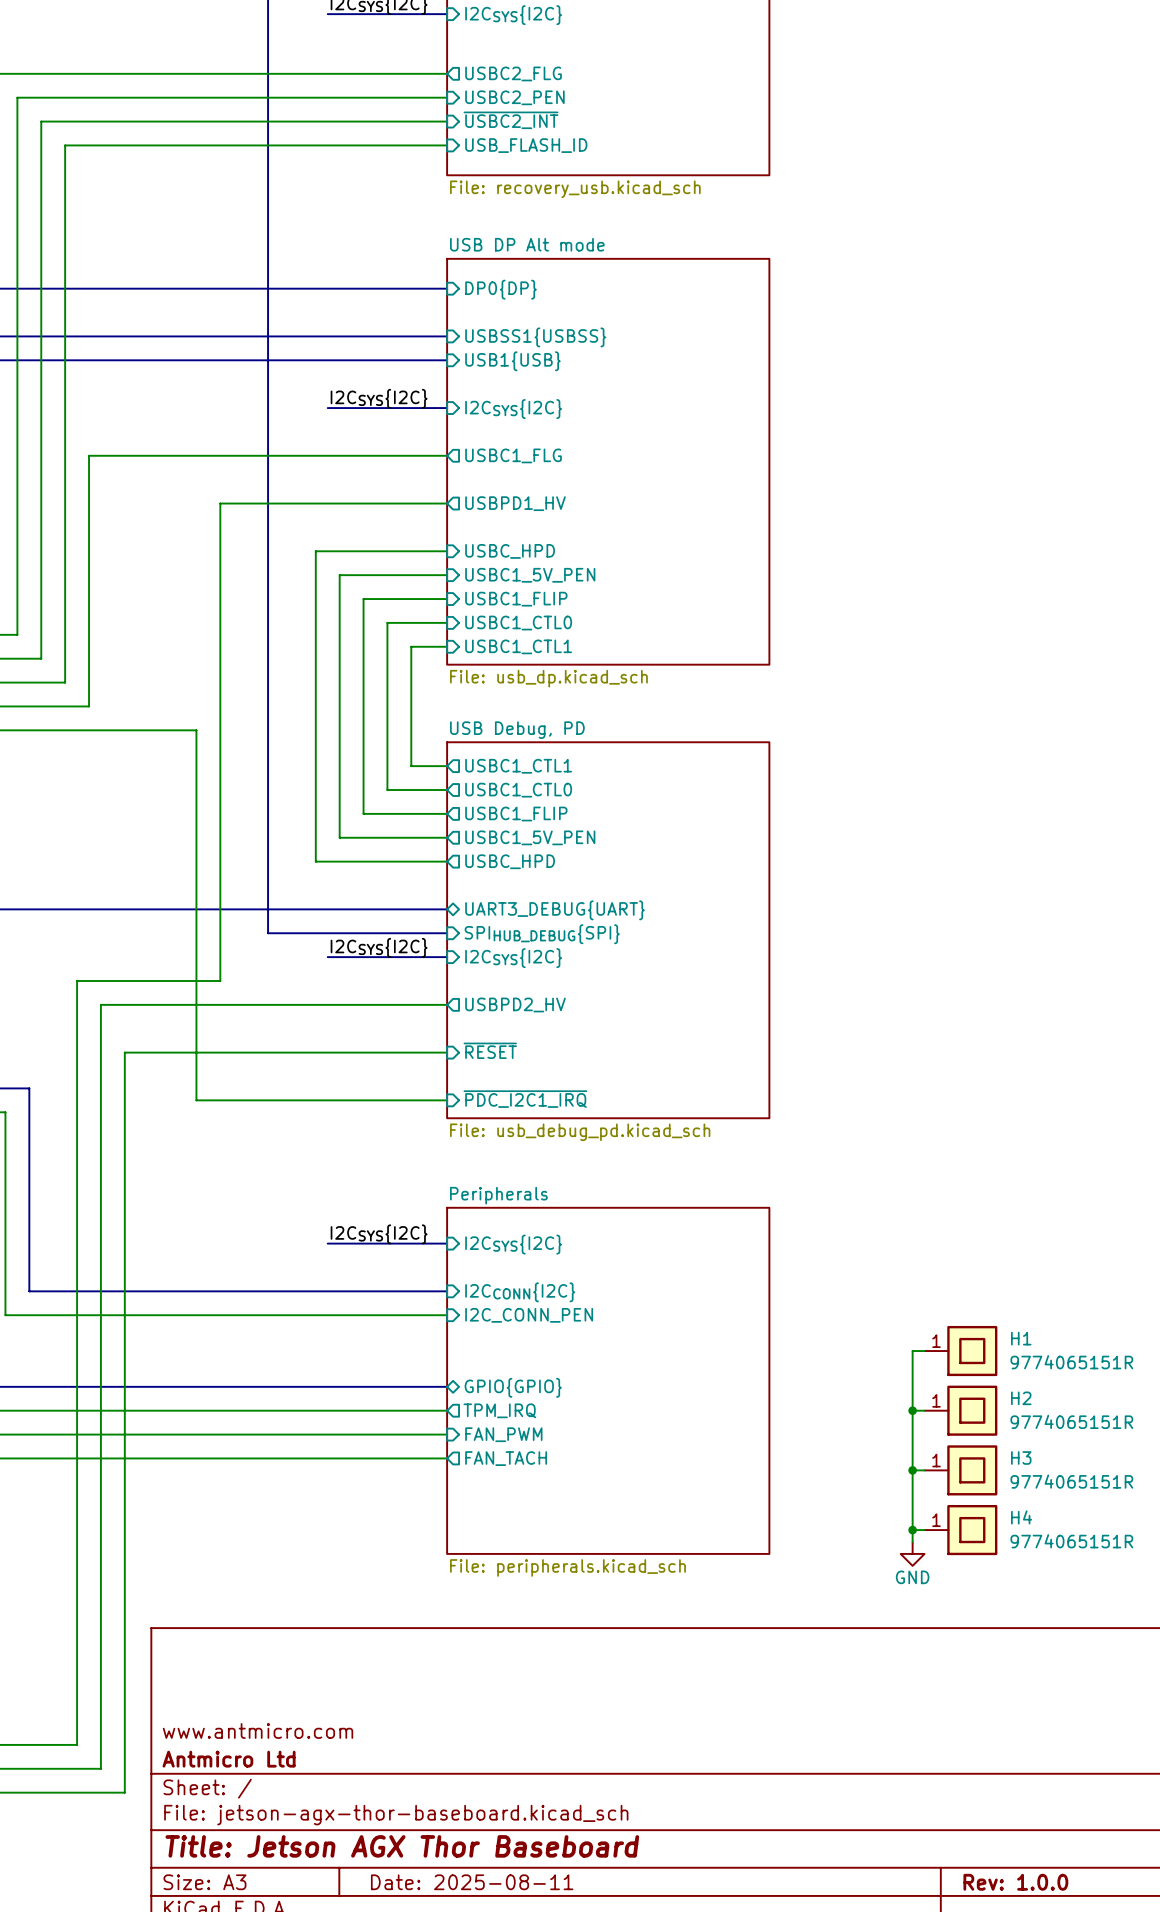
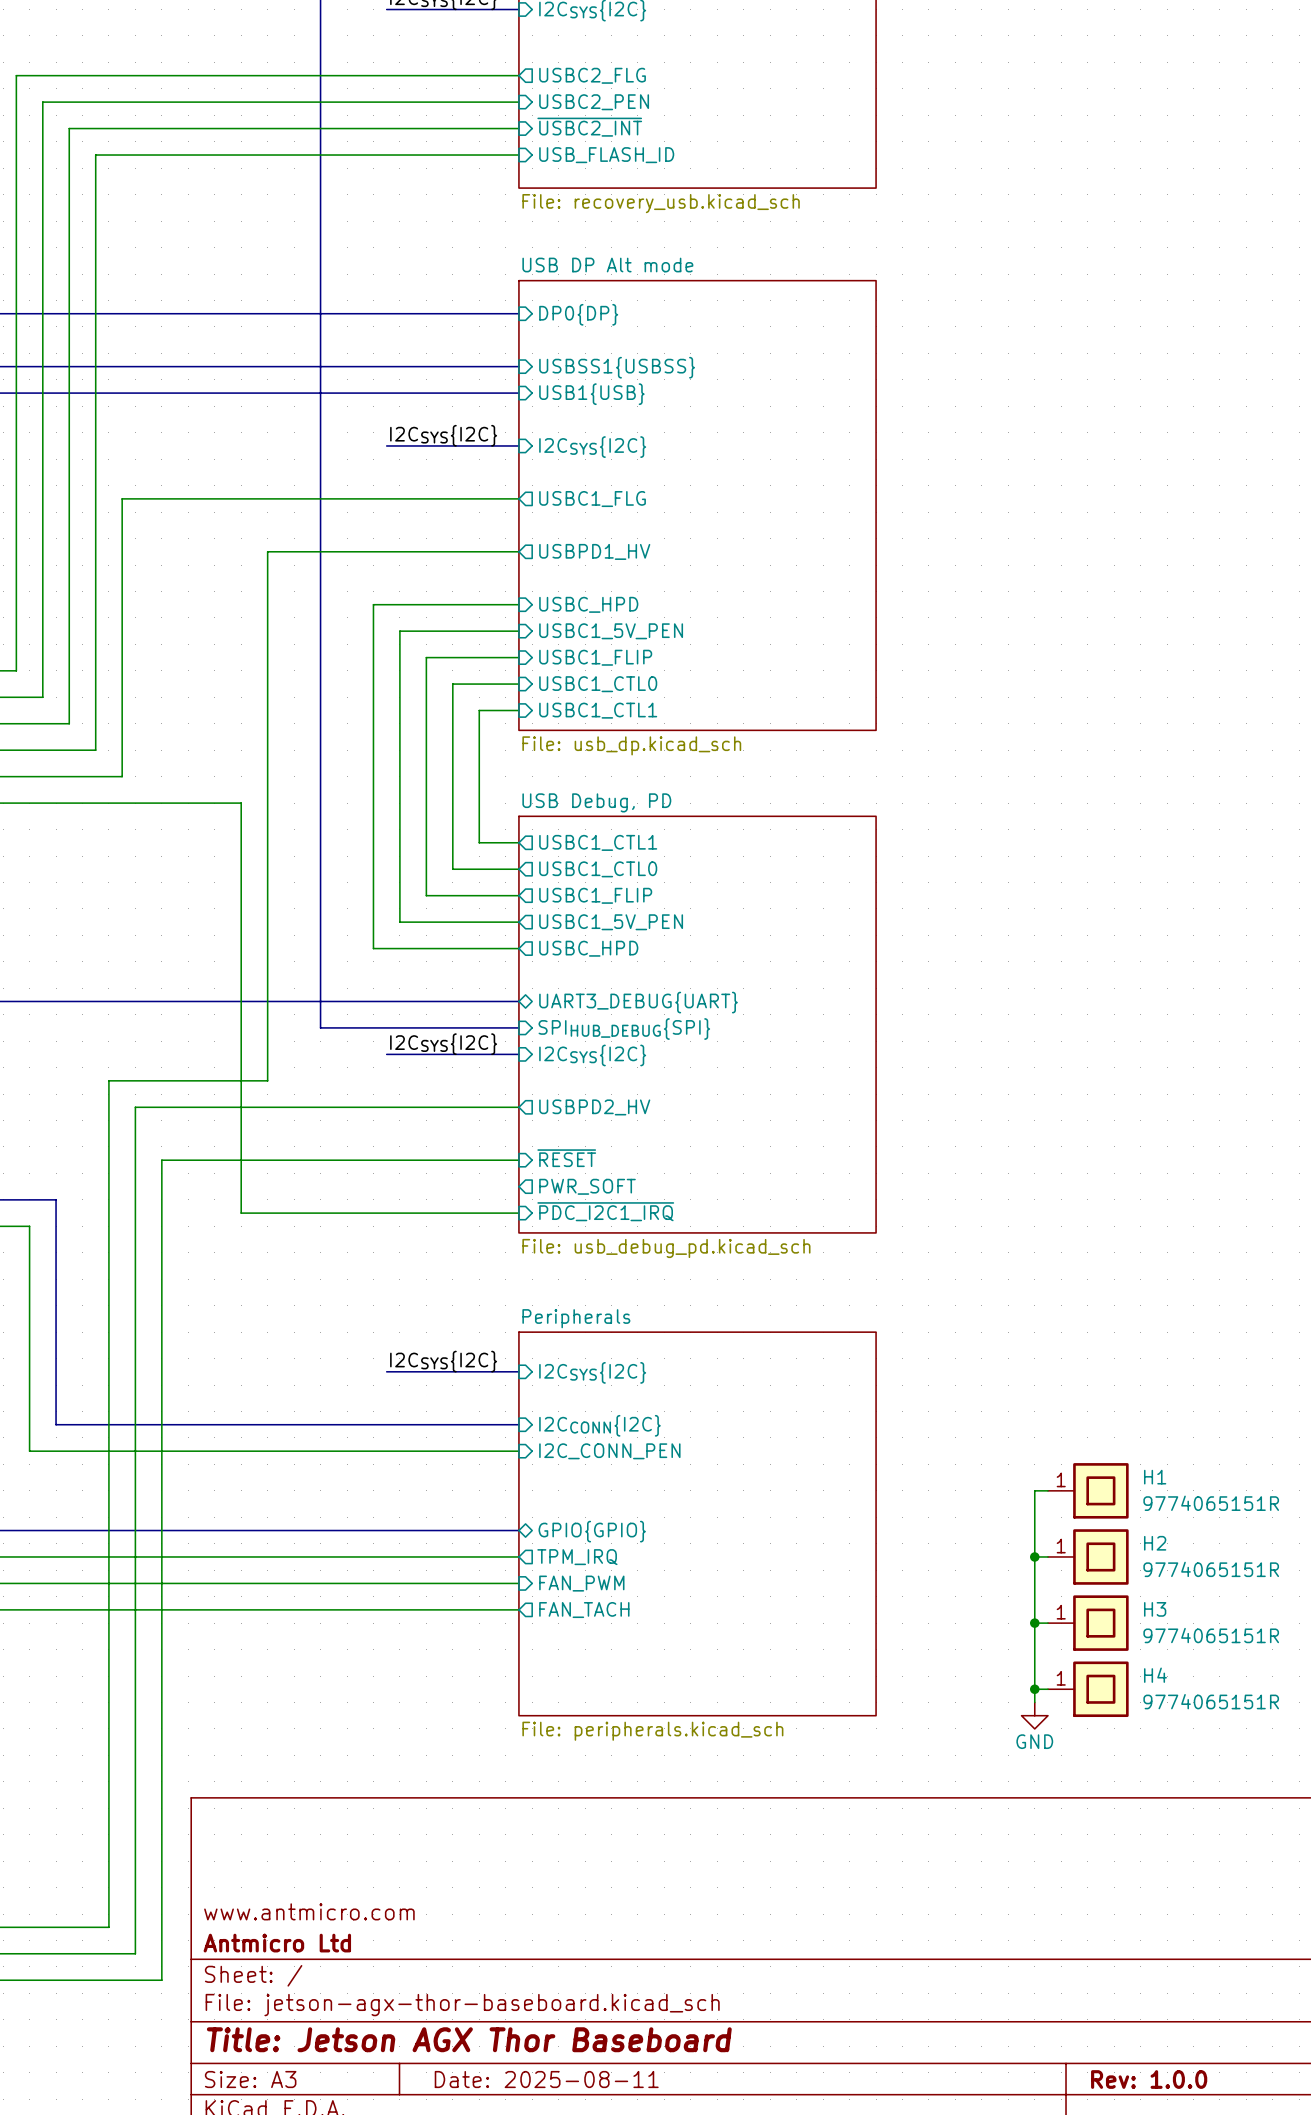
sheet pin: none -> PWR_SOFT (587, 1186)

